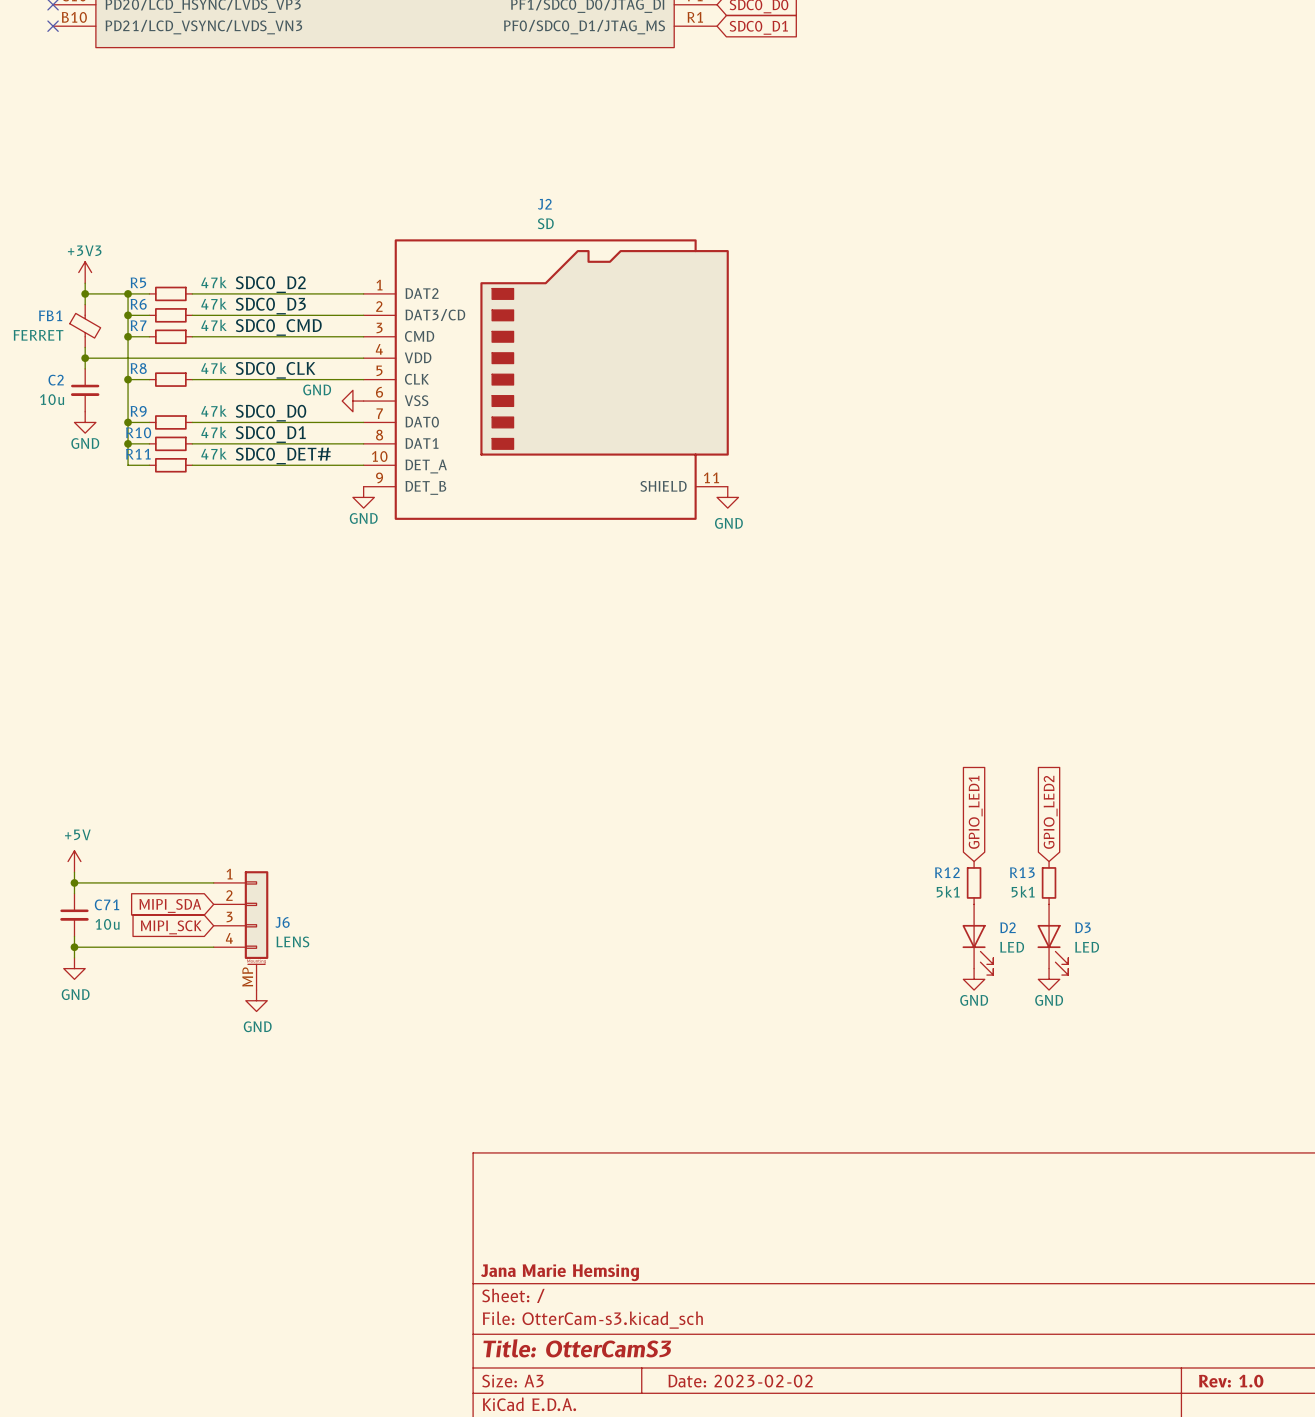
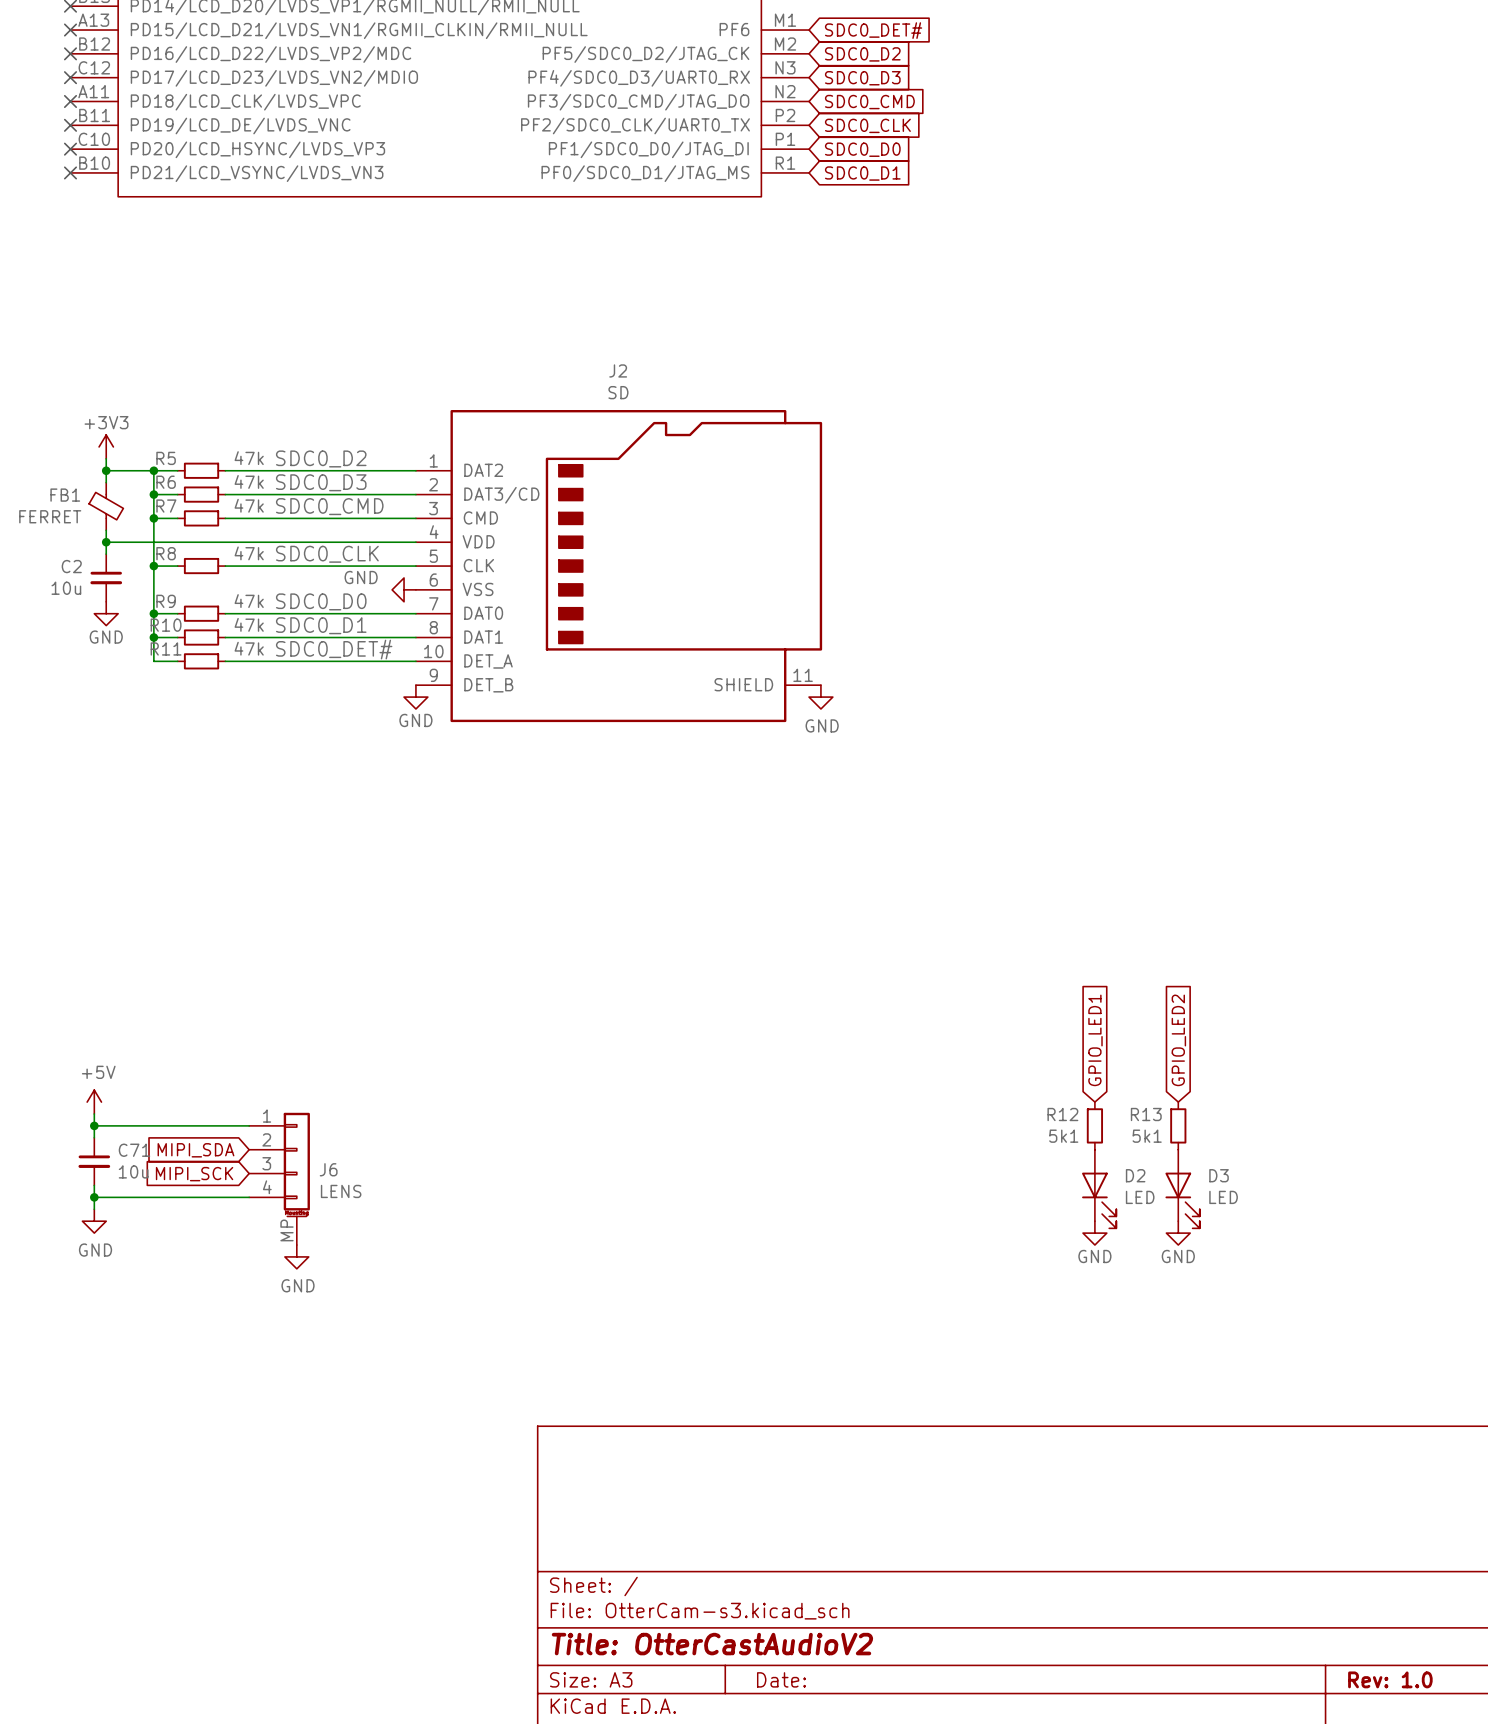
title block: Jana Marie Hemsing (559, 1272) -> none
title block: Title: OtterCamS3 (577, 1348) -> Title: OtterCastAudioV2 (712, 1644)
title block: Date: 2023-02-02 (740, 1381) -> Date: (781, 1679)

